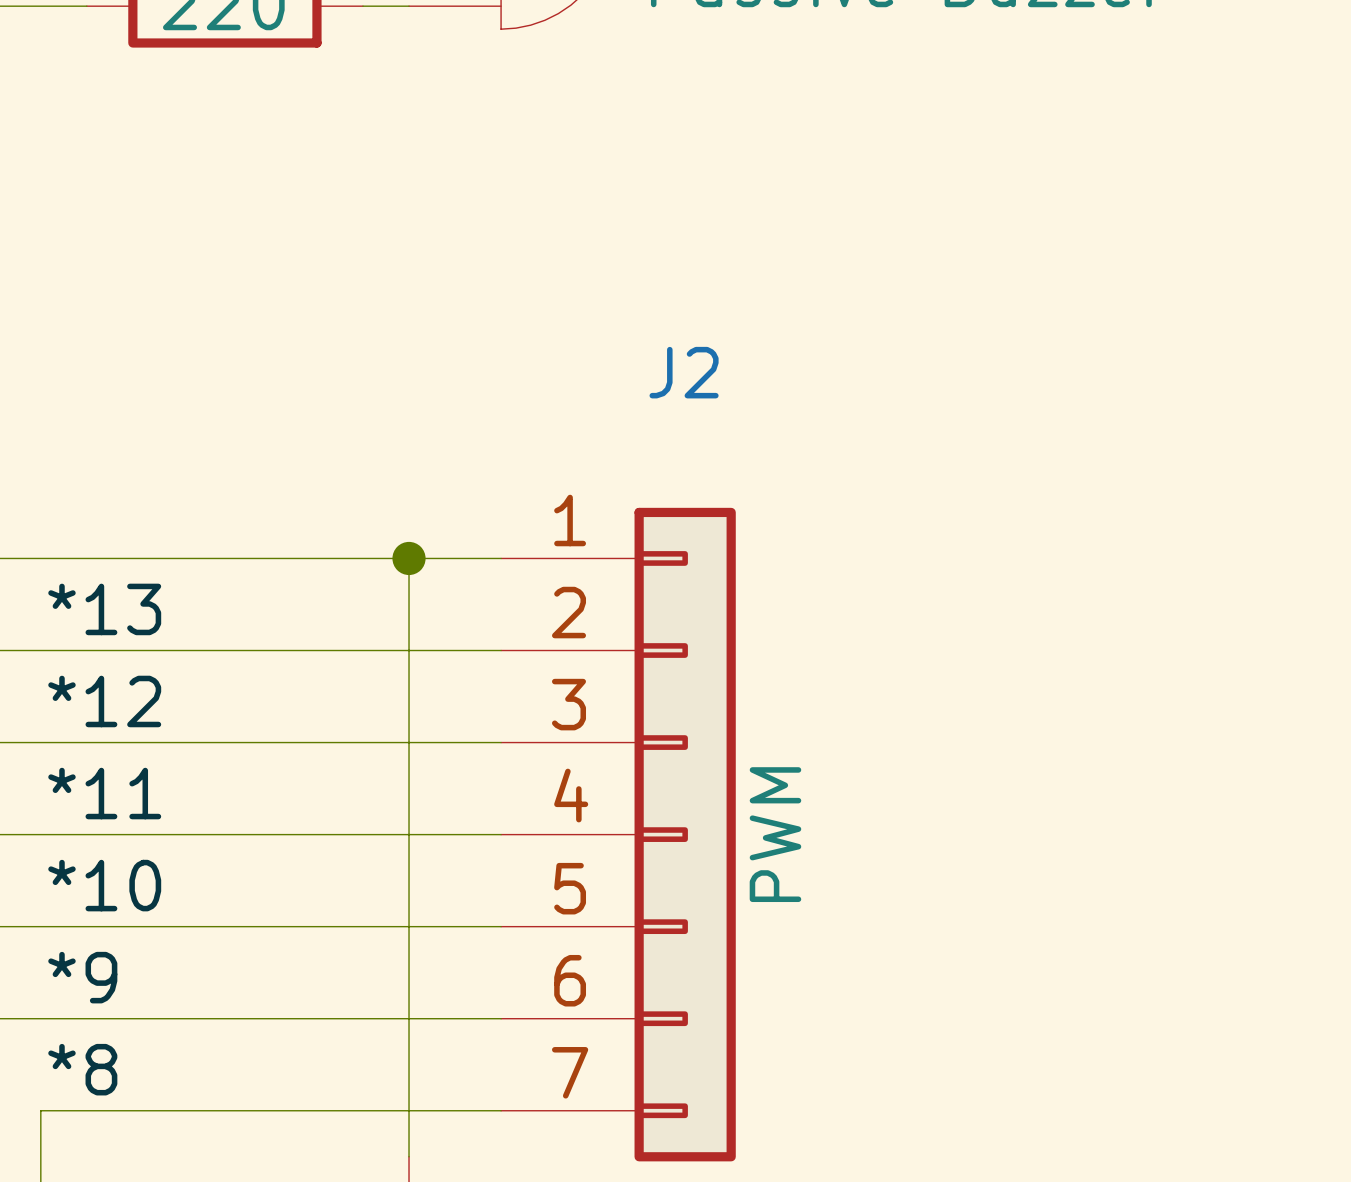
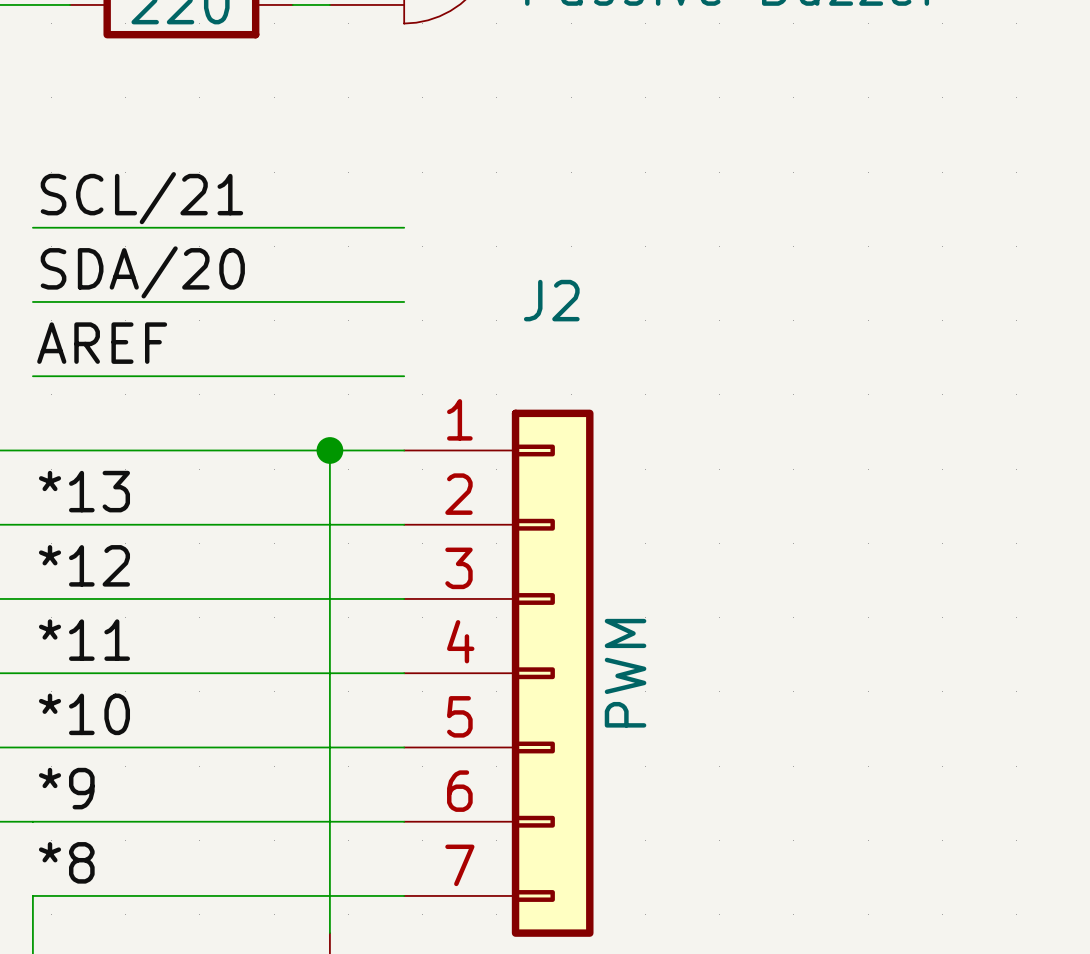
label: none -> SCL/21 (141, 198)
wire: none -> (32, 227) (404, 227)
label: none -> SDA/20 (142, 272)
wire: none -> (32, 301) (404, 301)
label: none -> AREF (102, 343)
wire: none -> (32, 376) (404, 376)

